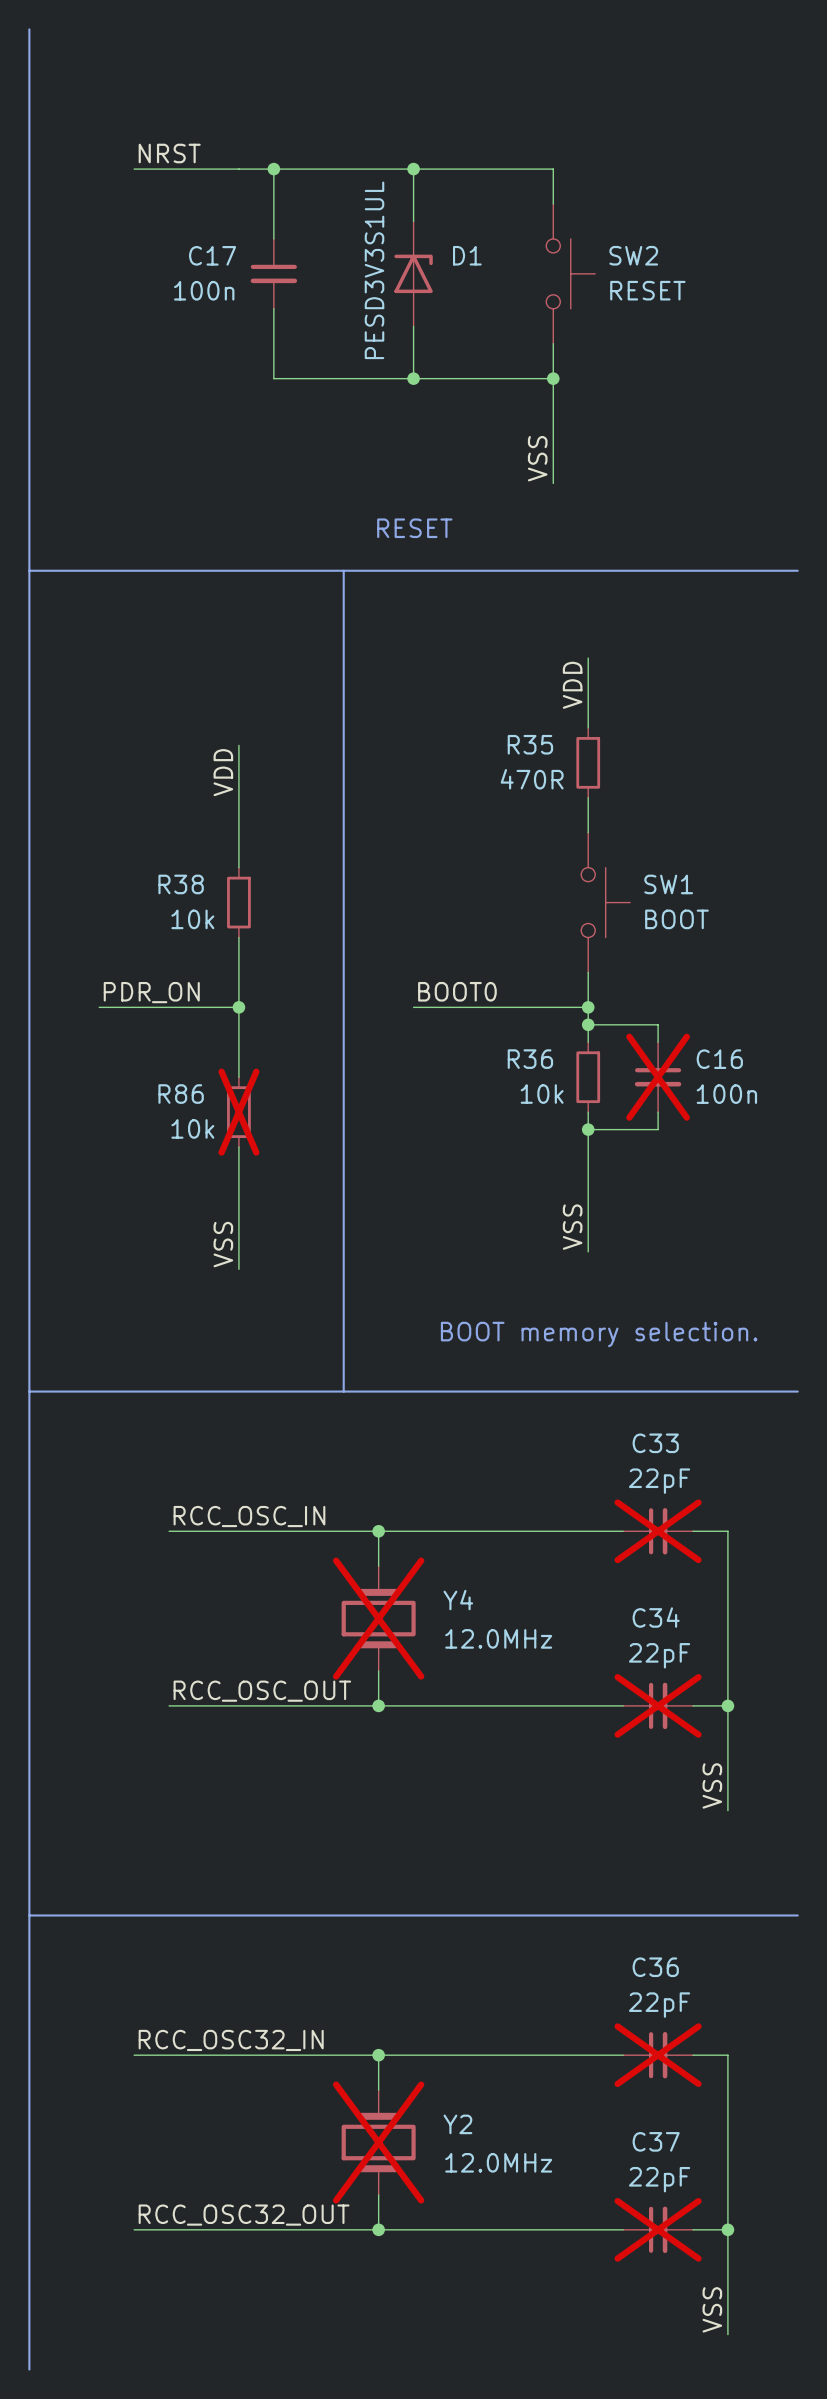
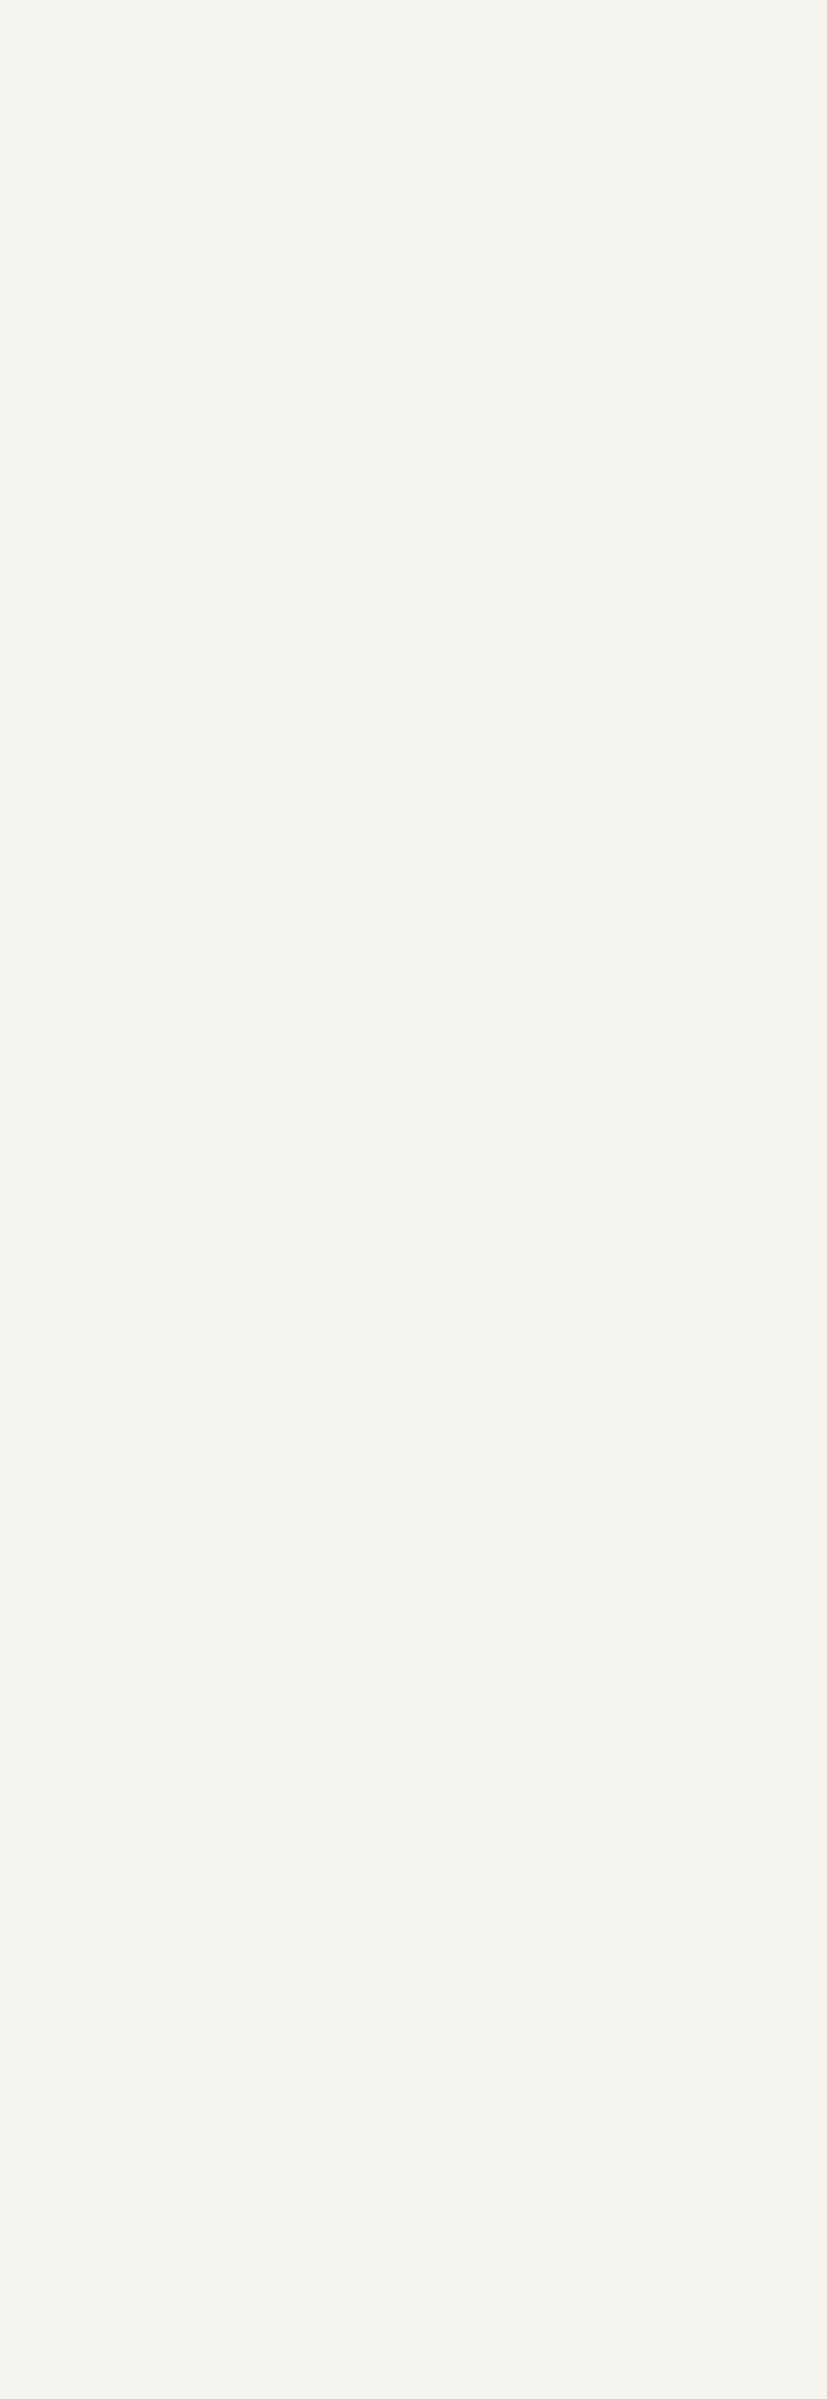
line: (29, 29) (29, 2369) -> none
label: NRST (169, 153) -> none
wire: (134, 169) (553, 169) (553, 204) -> none
wire: (273, 169) (273, 238) -> none
junction: (273, 169) -> none
wire: (413, 169) (413, 221) -> none
junction: (413, 169) -> none
C17: 100n (273, 273) -> none
D1: PESD3V3S1UL (413, 273) -> none
SW2: RESET (570, 273) -> none
wire: (273, 308) (273, 378) (553, 378) -> none
wire: (413, 326) (413, 378) -> none
wire: (553, 343) (553, 483) -> none
junction: (413, 378) -> none
junction: (553, 378) -> none
label: VSS (537, 458) -> none
text: RESET (414, 528) -> none
line: (29, 570) (797, 570) -> none
line: (343, 570) (343, 1391) -> none
wire: (588, 658) (588, 727) -> none
label: VDD (572, 685) -> none
wire: (238, 745) (238, 867) -> none
R35: 470R (588, 762) -> none
label: VDD (223, 772) -> none
wire: (588, 797) (588, 832) -> none
R38: 10k (238, 902) -> none
SW1: BOOT (605, 902) -> none
wire: (238, 937) (238, 1077) -> none
wire: (588, 972) (588, 1042) -> none
label: BOOT0 (457, 991) -> none
label: PDR_ON (151, 992) -> none
wire: (99, 1007) (238, 1007) -> none
junction: (238, 1007) -> none
wire: (413, 1007) (588, 1007) -> none
junction: (588, 1007) -> none
wire: (588, 1024) (658, 1024) (658, 1042) -> none
junction: (588, 1024) -> none
R36: 10k (588, 1077) -> none
C16: 100n (658, 1077) -> none
R86: 10k (238, 1112) -> none
wire: (588, 1112) (588, 1251) -> none
wire: (658, 1112) (658, 1129) (588, 1129) -> none
junction: (588, 1129) -> none
wire: (238, 1147) (238, 1269) -> none
label: VSS (572, 1227) -> none
label: VSS (223, 1244) -> none
text: BOOT memory selection. (599, 1334) -> none
line: (29, 1391) (797, 1391) -> none
label: RCC_OSC_IN (249, 1516) -> none
wire: (169, 1531) (623, 1531) -> none
wire: (378, 1531) (378, 1566) -> none
junction: (378, 1531) -> none
C33: 22pF (658, 1531) -> none
wire: (693, 1531) (727, 1531) (727, 1810) -> none
Y4: 12.0MHz (378, 1618) -> none
wire: (378, 1670) (378, 1705) -> none
label: RCC_OSC_OUT (262, 1691) -> none
wire: (169, 1705) (623, 1705) -> none
junction: (378, 1705) -> none
C34: 22pF (658, 1705) -> none
wire: (693, 1705) (727, 1705) -> none
junction: (727, 1705) -> none
label: VSS (712, 1785) -> none
line: (29, 1915) (797, 1915) -> none
label: RCC_OSC32_IN (231, 2040) -> none
wire: (134, 2055) (623, 2055) -> none
wire: (378, 2055) (378, 2090) -> none
junction: (378, 2055) -> none
C36: 22pF (658, 2055) -> none
wire: (693, 2055) (727, 2055) (727, 2334) -> none
Y2: 12.0MHz (378, 2142) -> none
wire: (378, 2194) (378, 2229) -> none
label: RCC_OSC32_OUT (244, 2215) -> none
wire: (134, 2229) (623, 2229) -> none
junction: (378, 2229) -> none
C37: 22pF (658, 2229) -> none
wire: (693, 2229) (727, 2229) -> none
junction: (727, 2229) -> none
label: VSS (712, 2309) -> none

